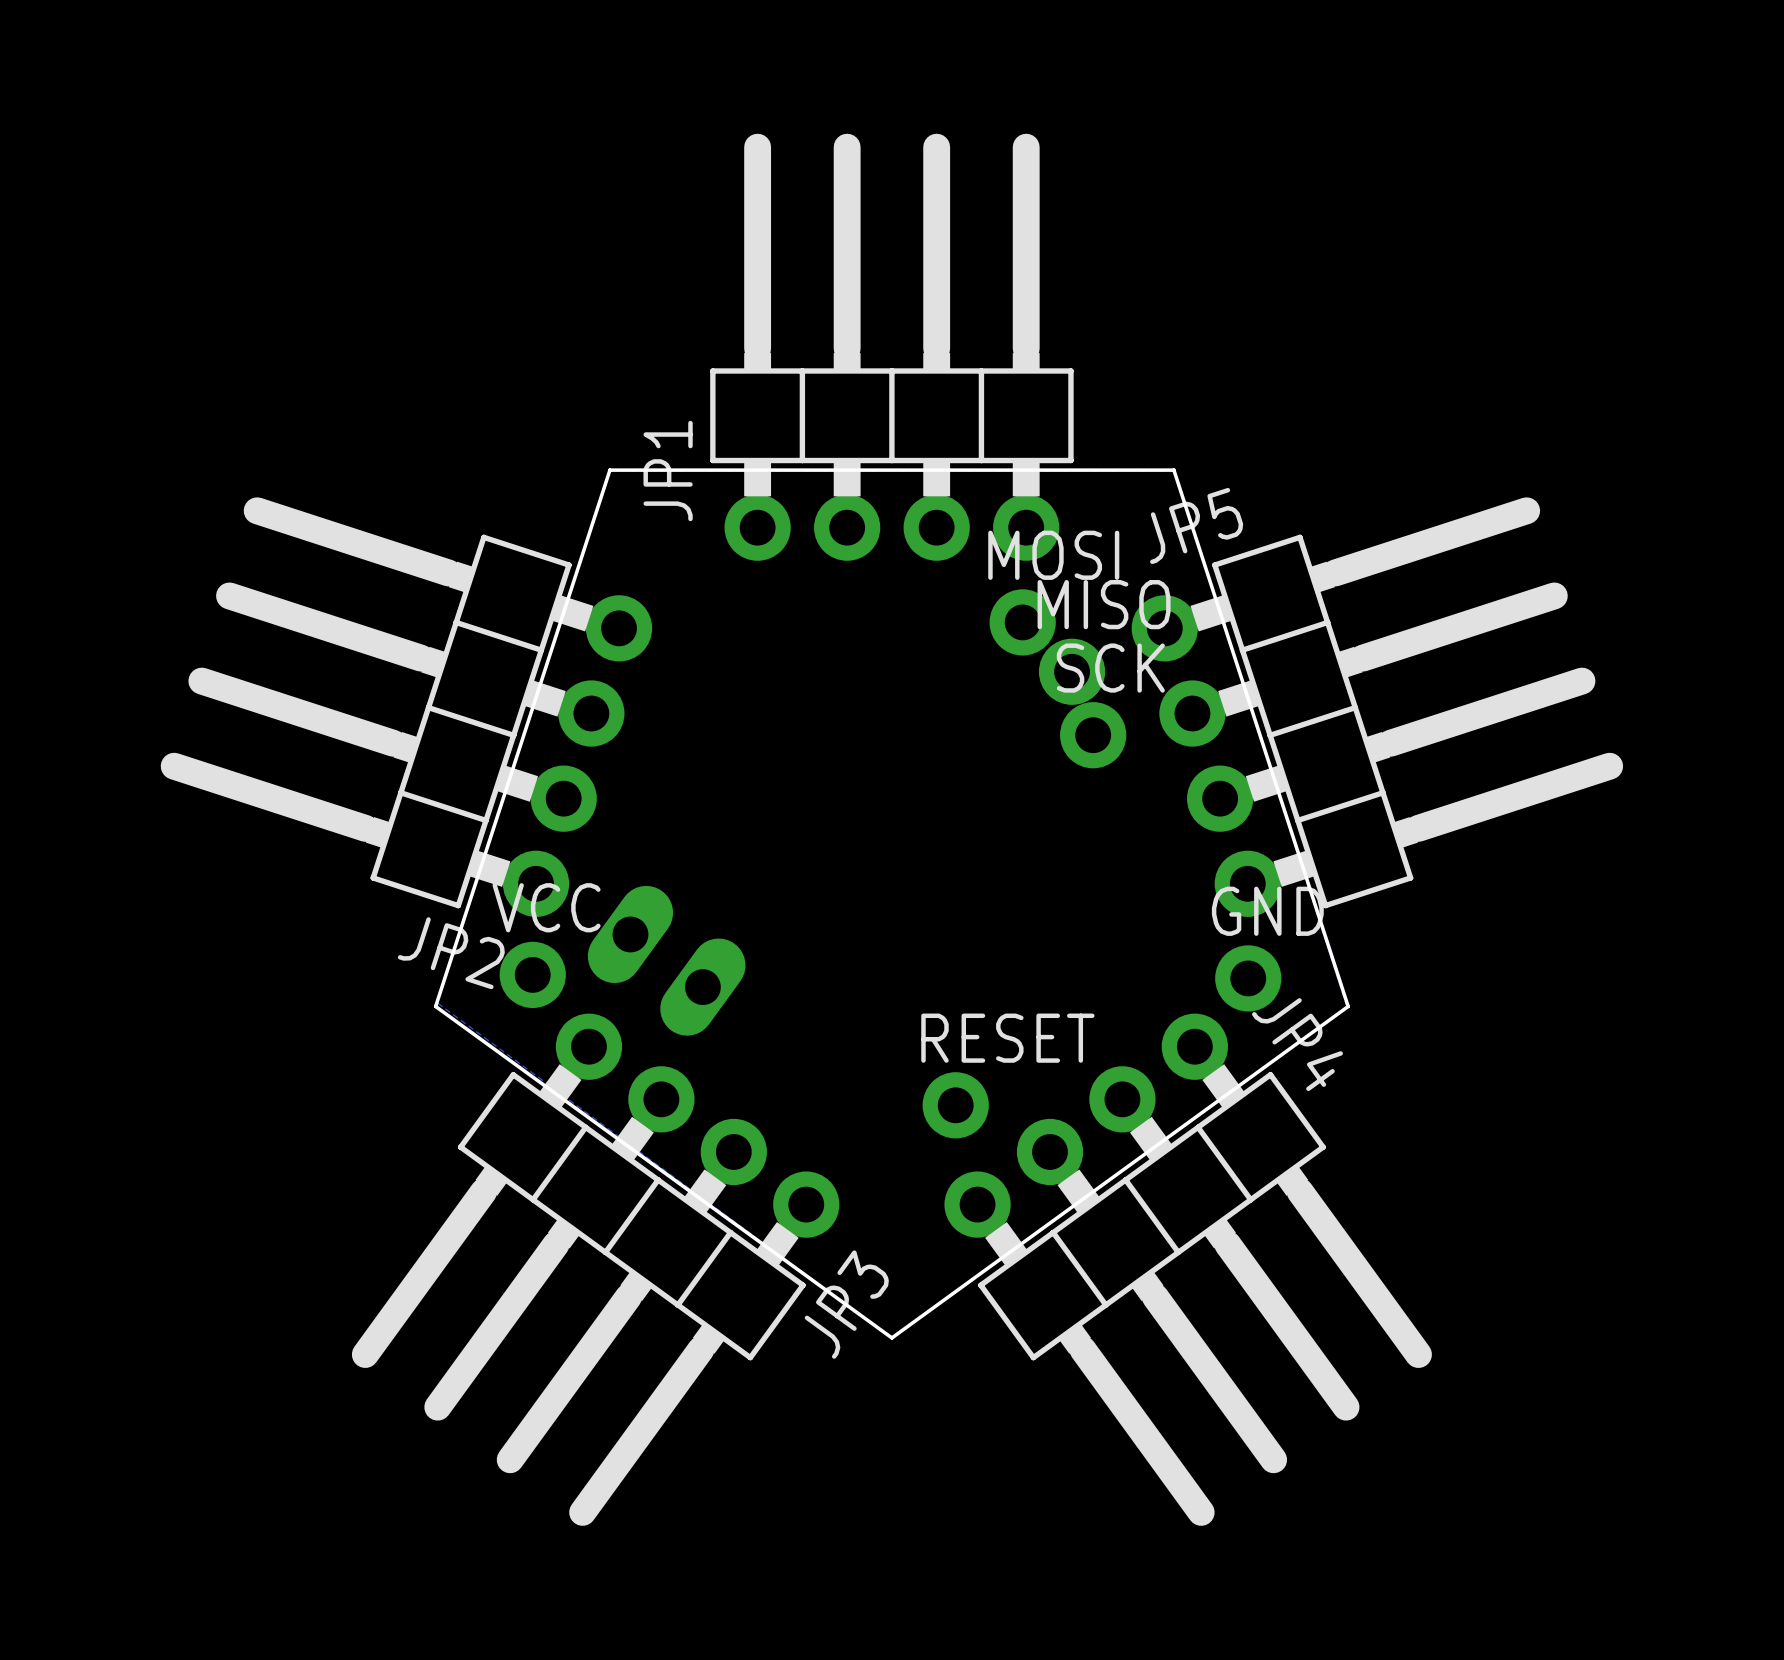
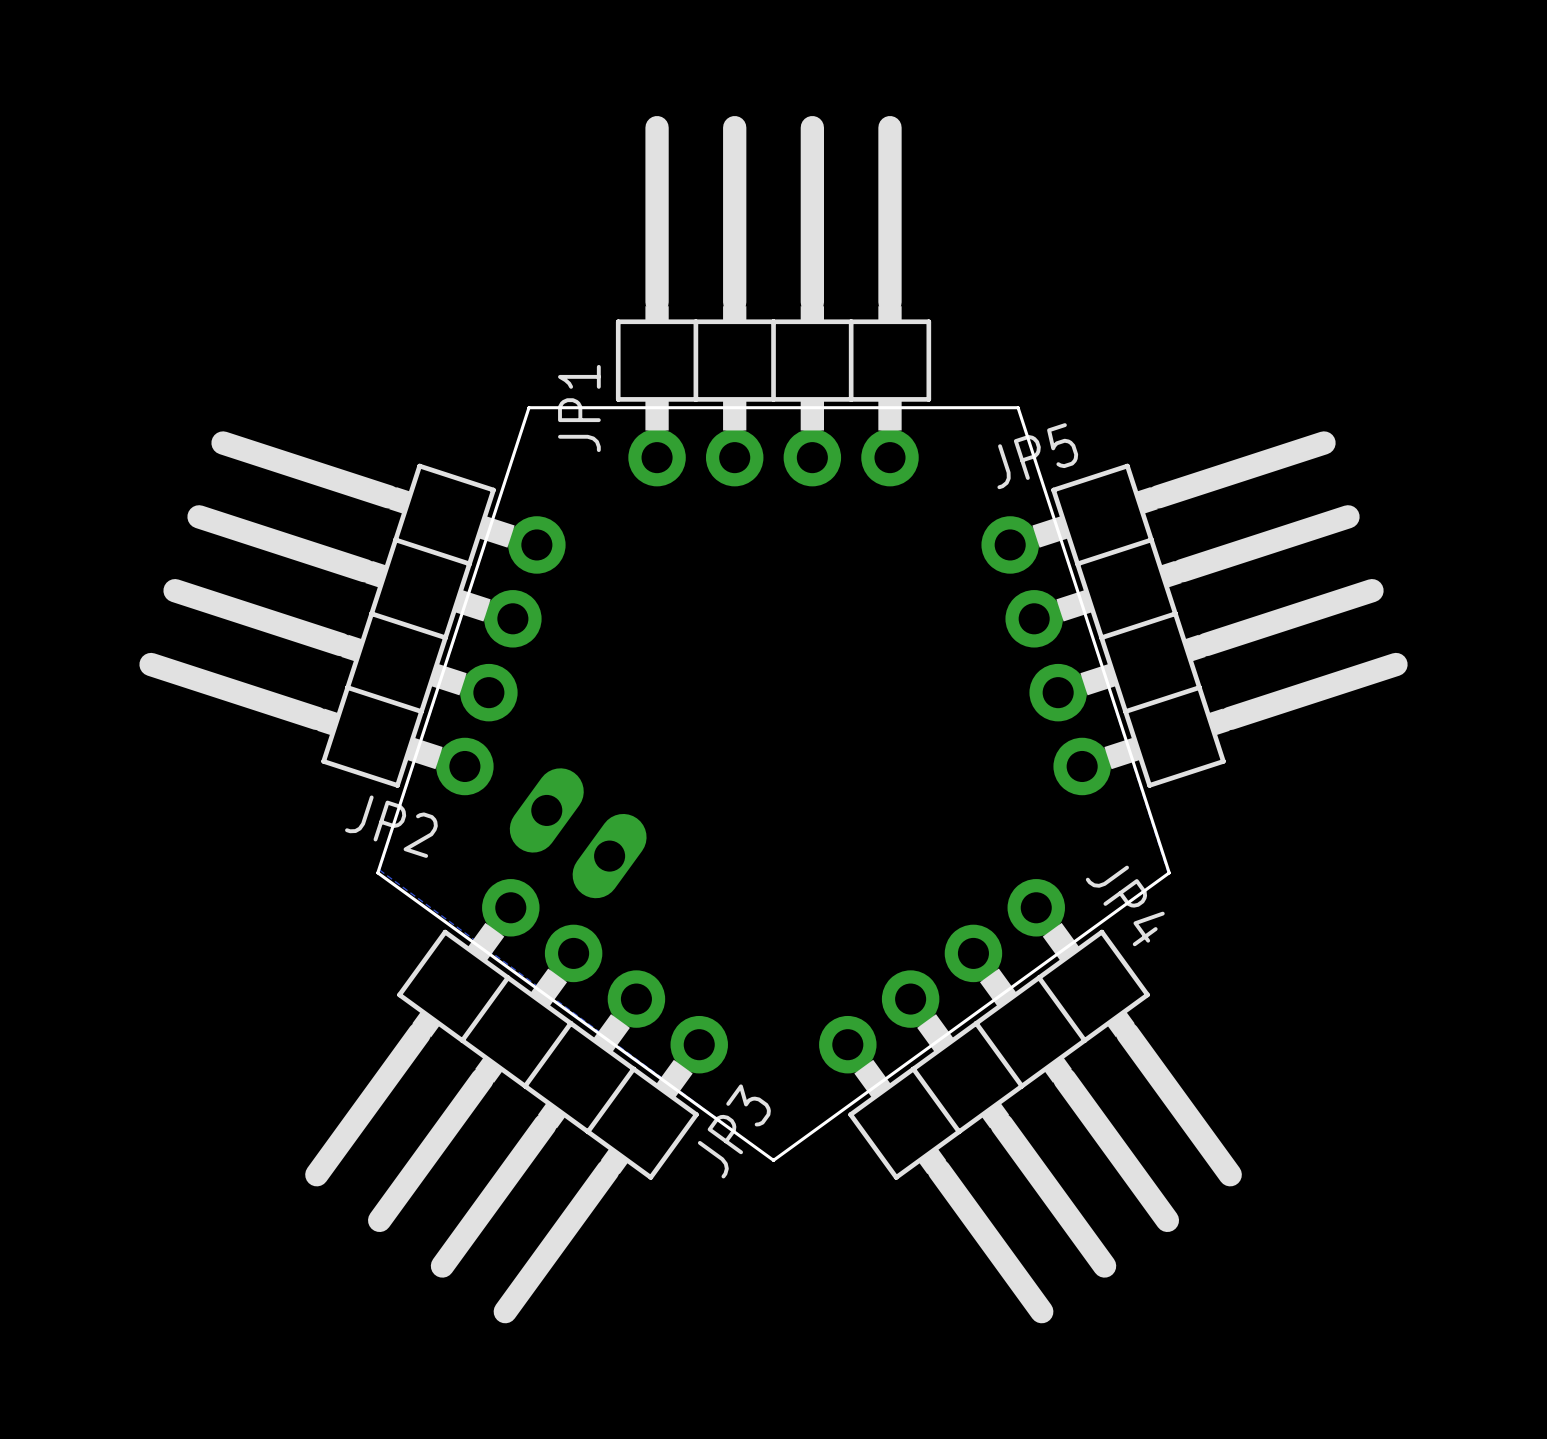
MOSI: (1022, 622) -> none
MISO: (1072, 671) -> none
SCK: (1093, 735) -> none
VCC: (532, 974) -> none
GND: (1248, 978) -> none
RESET: (955, 1105) -> none

